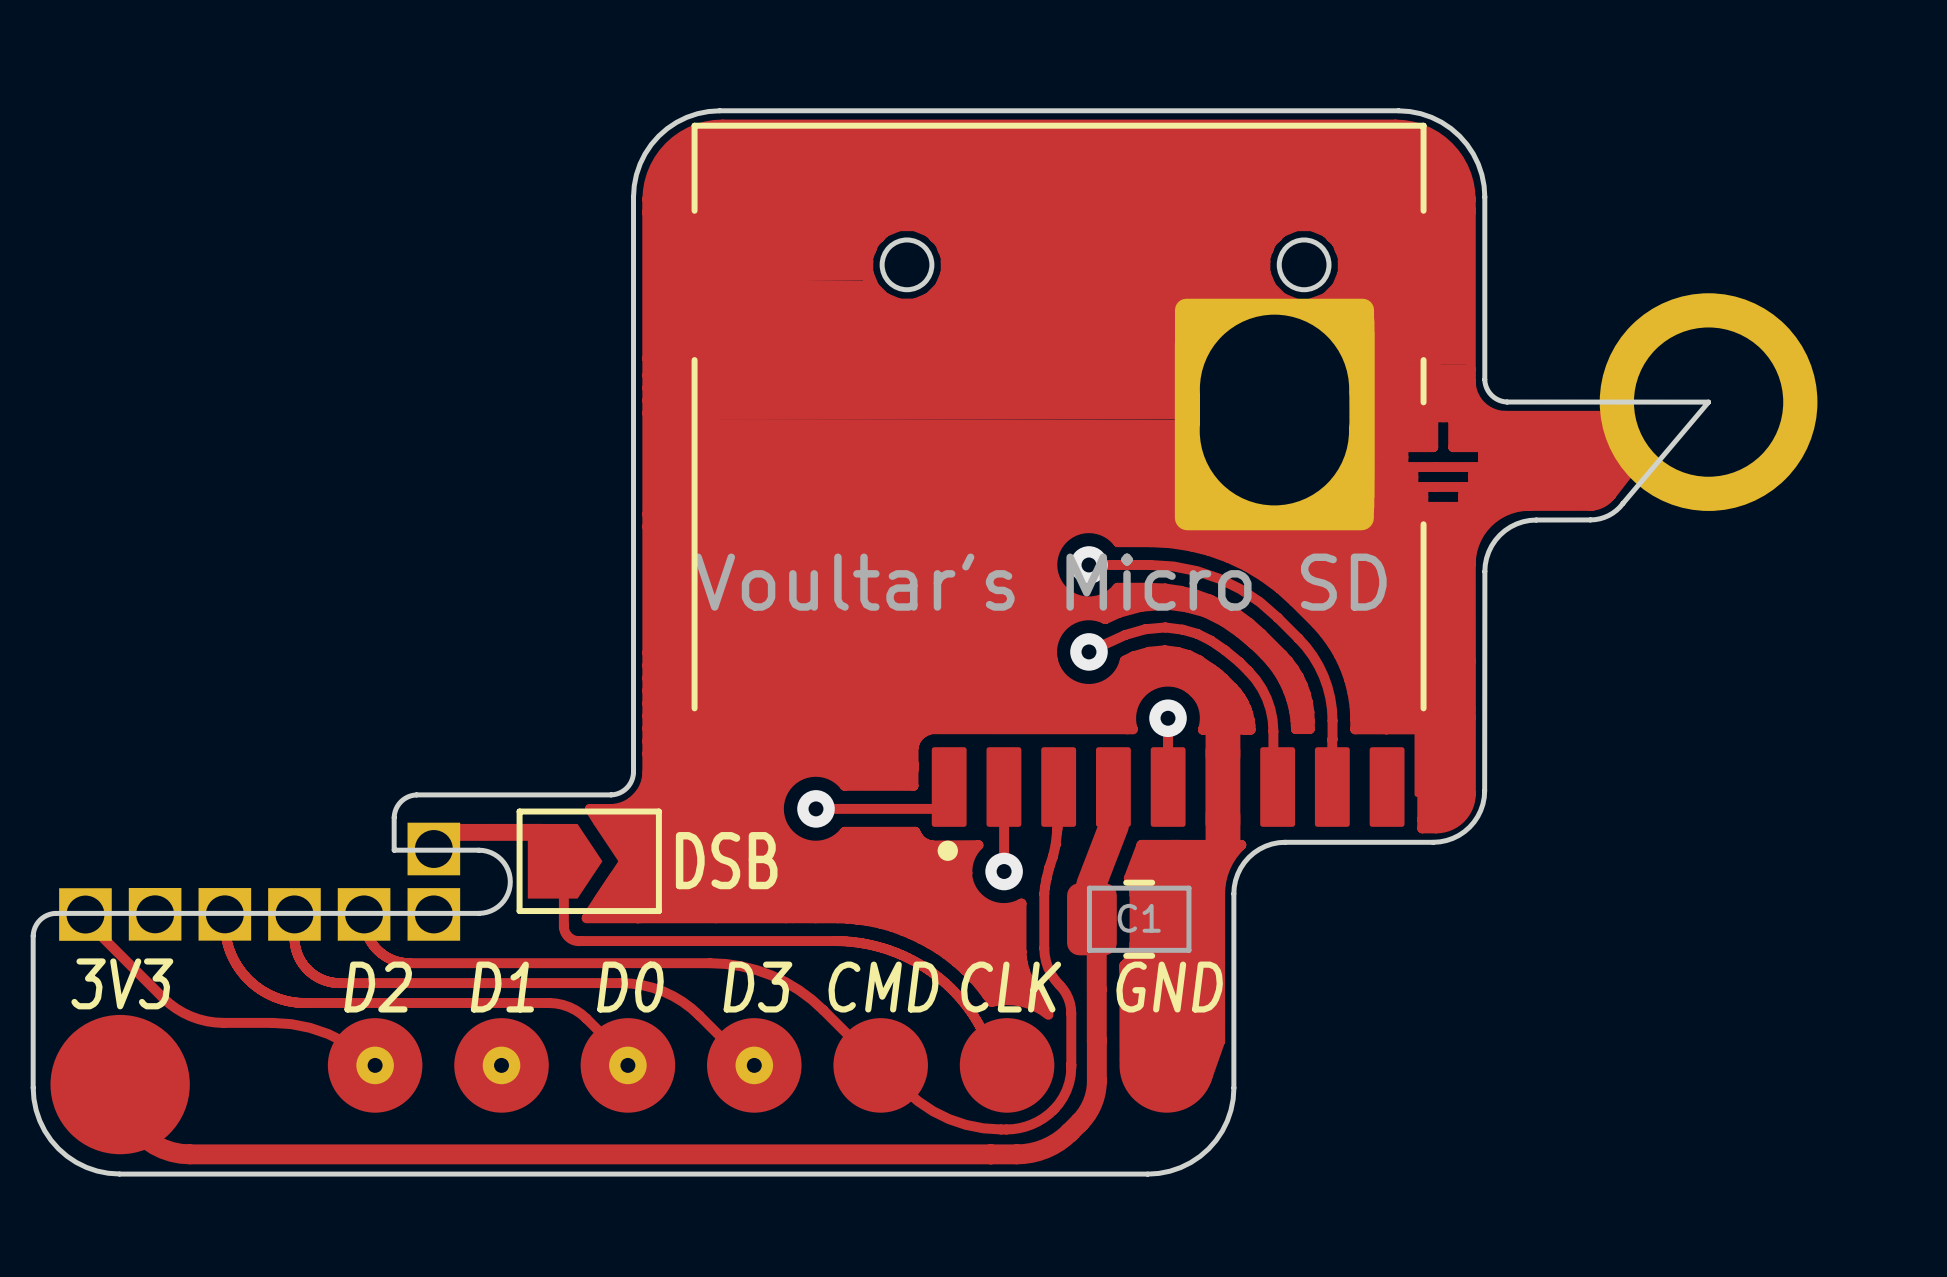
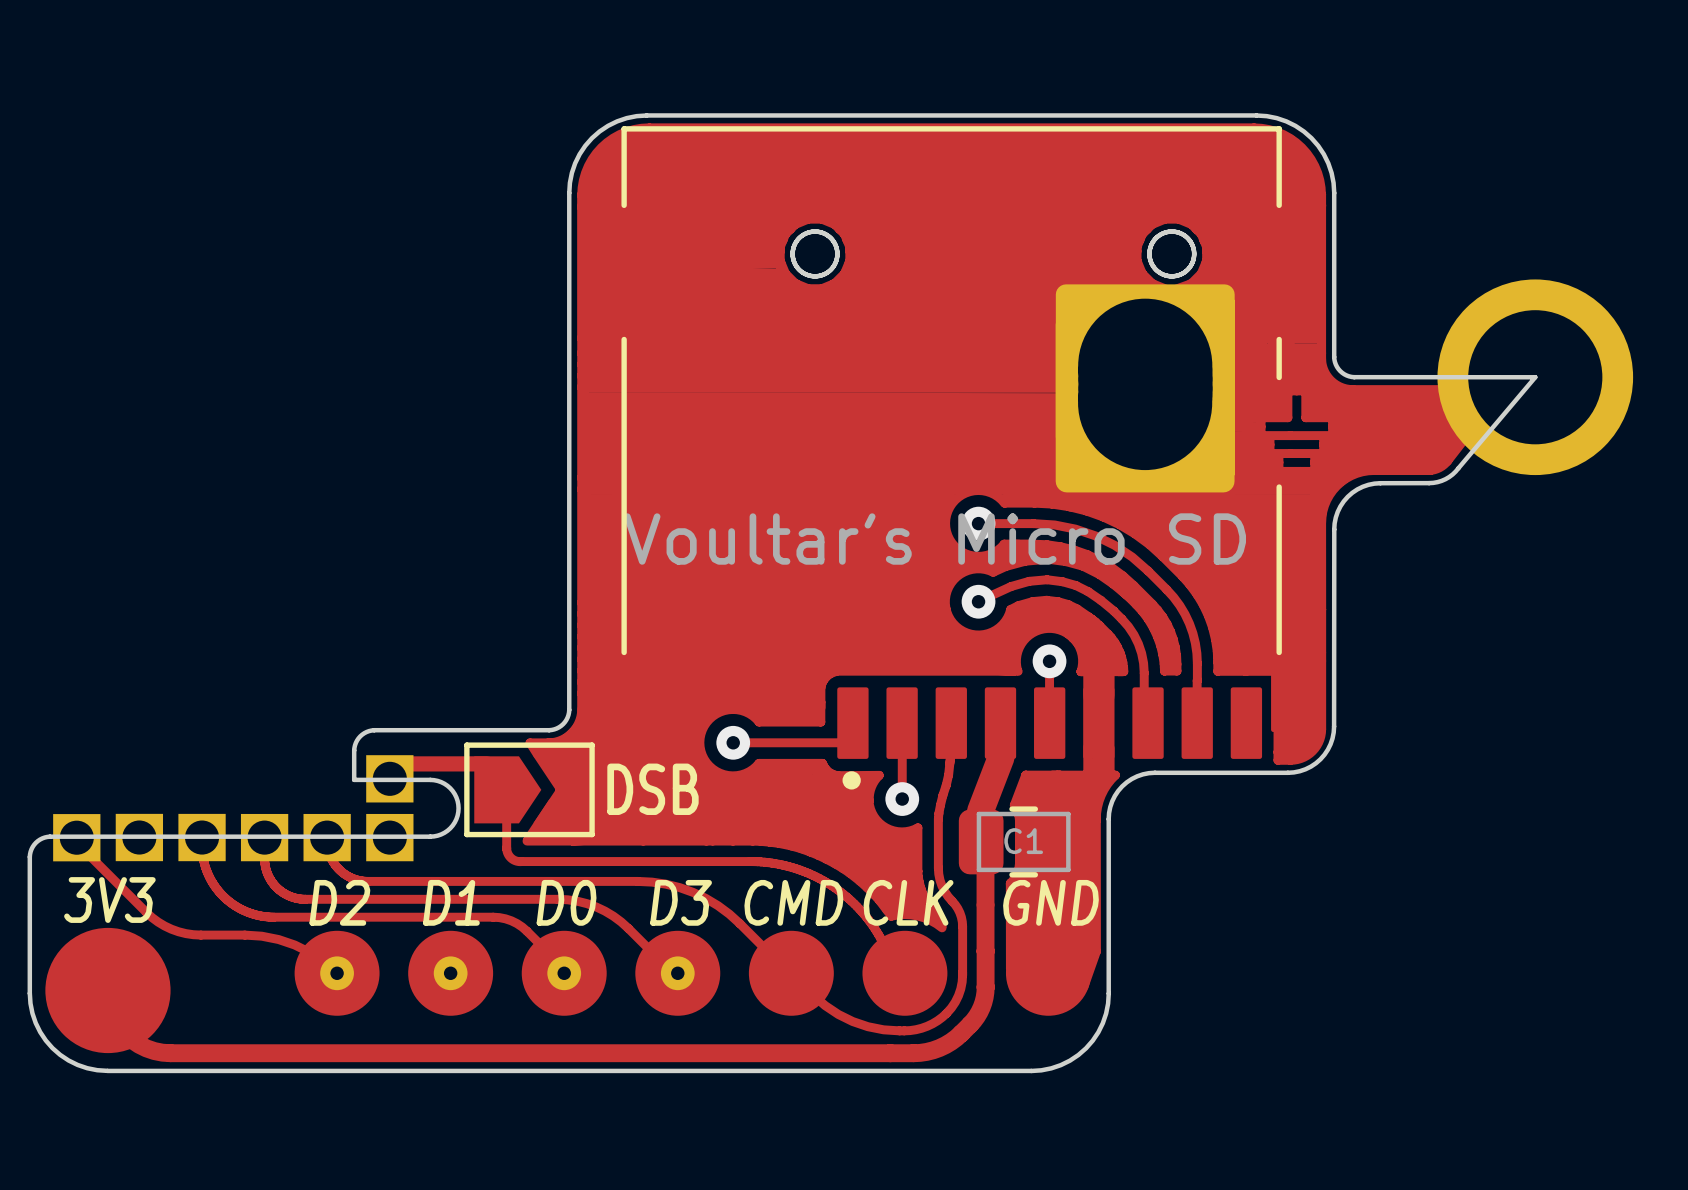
part footprint: [643, 122, 1475, 861] -> [578, 126, 1325, 790]
board edge: none -> (811, 231) (819, 232) (827, 235) (833, 241) (837, 249) (836, 258) (833, 266) (827, 272) (819, 275) (810, 275) (802, 272) (796, 266) (793, 257) (793, 248) (796, 241) (802, 235) (811, 231)
board edge: none -> (1167, 231) (1159, 235) (1153, 241) (1150, 248) (1149, 257) (1153, 266) (1159, 272) (1166, 275) (1175, 275) (1184, 272) (1190, 266) (1193, 258) (1193, 249) (1190, 241) (1184, 235) (1176, 232) (1167, 231)

